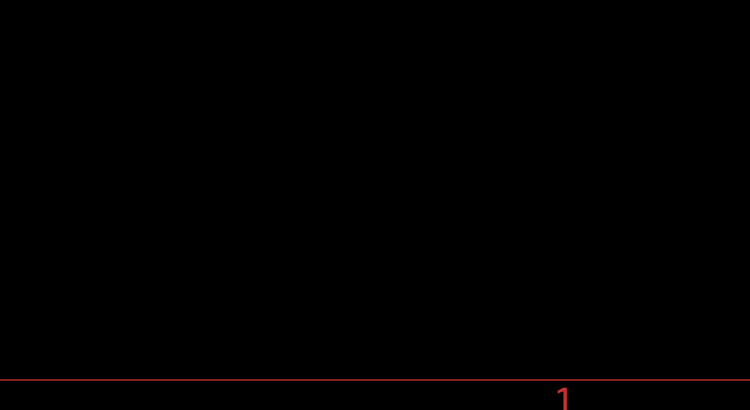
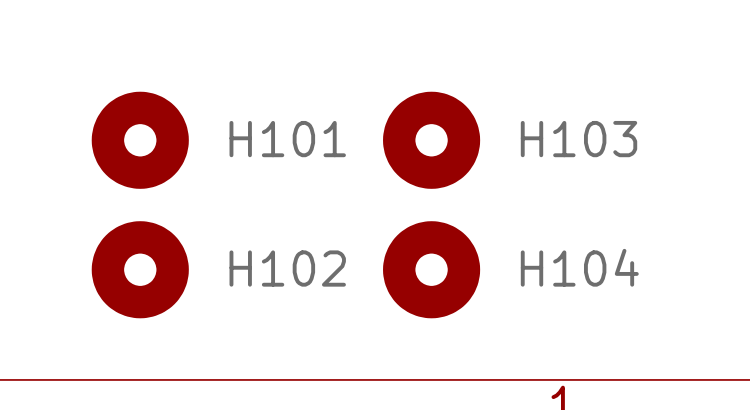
H101: none -> (140, 140)
H103: none -> (431, 140)
H102: none -> (140, 269)
H104: none -> (431, 269)

